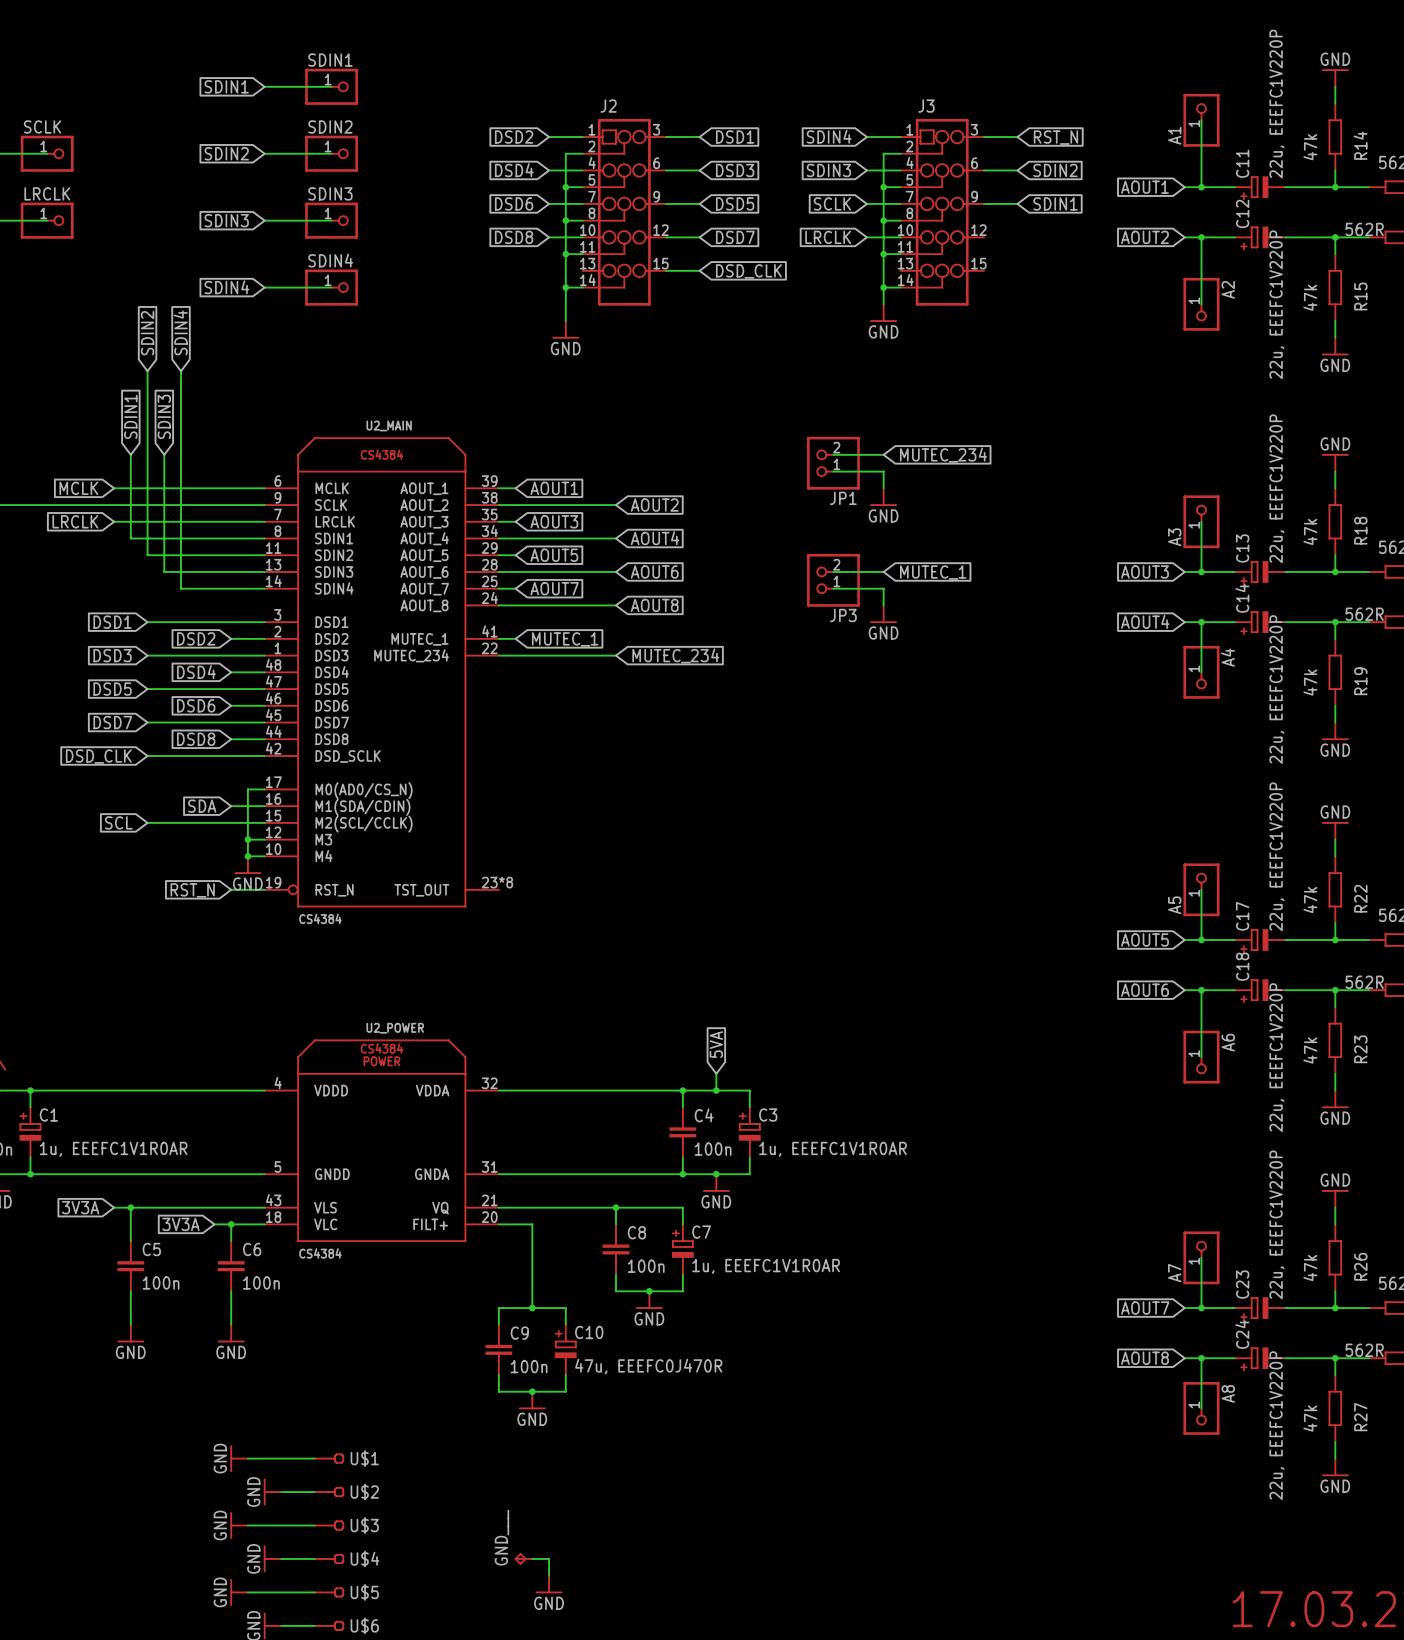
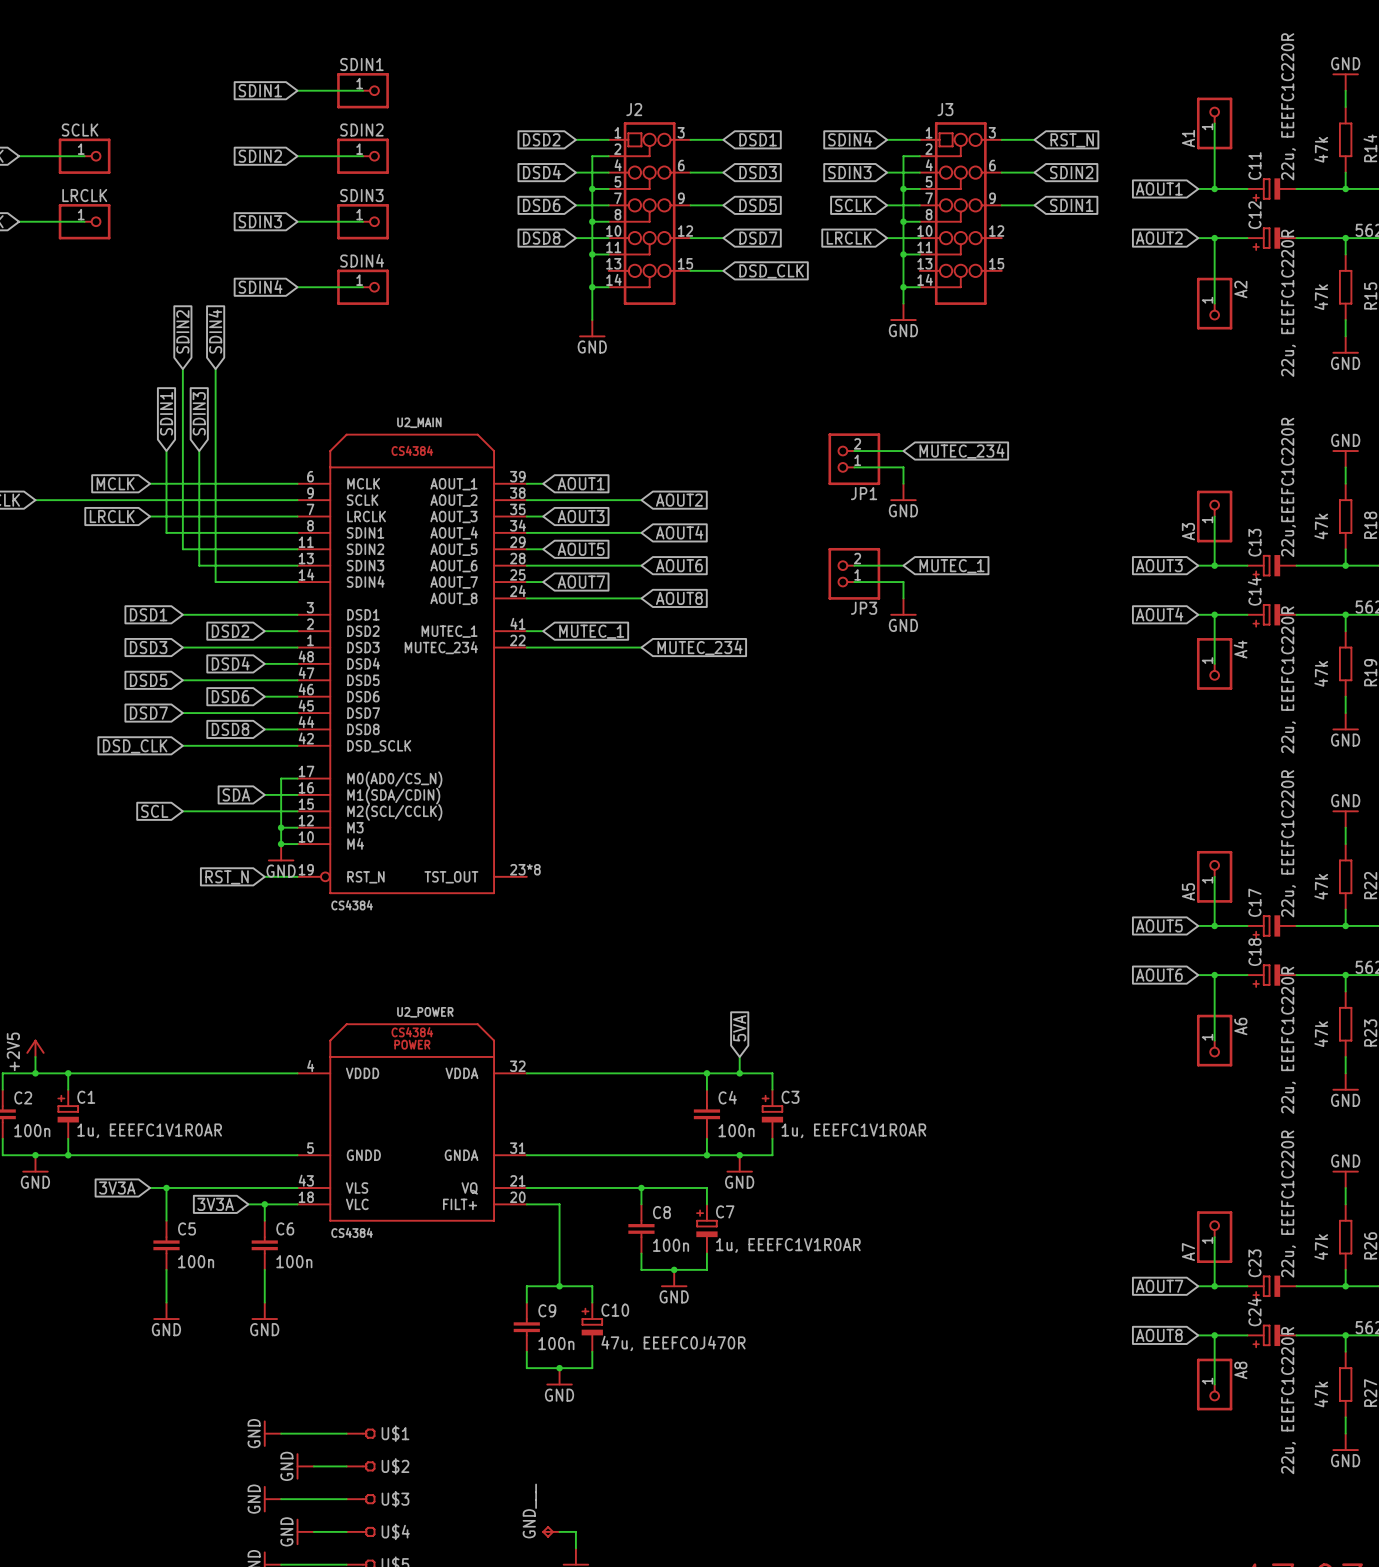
C11 value: 22u, EEEFC1V220P (1276, 104) -> 22u, EEEFC1C220R (1288, 106)
C12 value: 22u, EEEFC1V220P (1276, 304) -> 22u, EEEFC1C220R (1288, 303)
C13 value: 22u, EEEFC1V220P (1276, 488) -> 22u,EEEFC1C220R (1288, 487)
C14 value: 22u, EEEFC1V220P (1276, 689) -> 22u, EEEFC1C220R (1288, 680)
C17 value: 22u, EEEFC1V220P (1276, 856) -> 22u, EEEFC1C220R (1288, 843)
C18 value: 22u, EEEFC1V220P (1276, 1057) -> 22u, EEEFC1C220R (1288, 1040)
C23 value: 22u, EEEFC1V220P (1276, 1224) -> 22u, EEEFC1C220R (1288, 1204)
C24 value: 22u, EEEFC1V220P (1276, 1425) -> 22u, EEEFC1C220R (1288, 1400)

